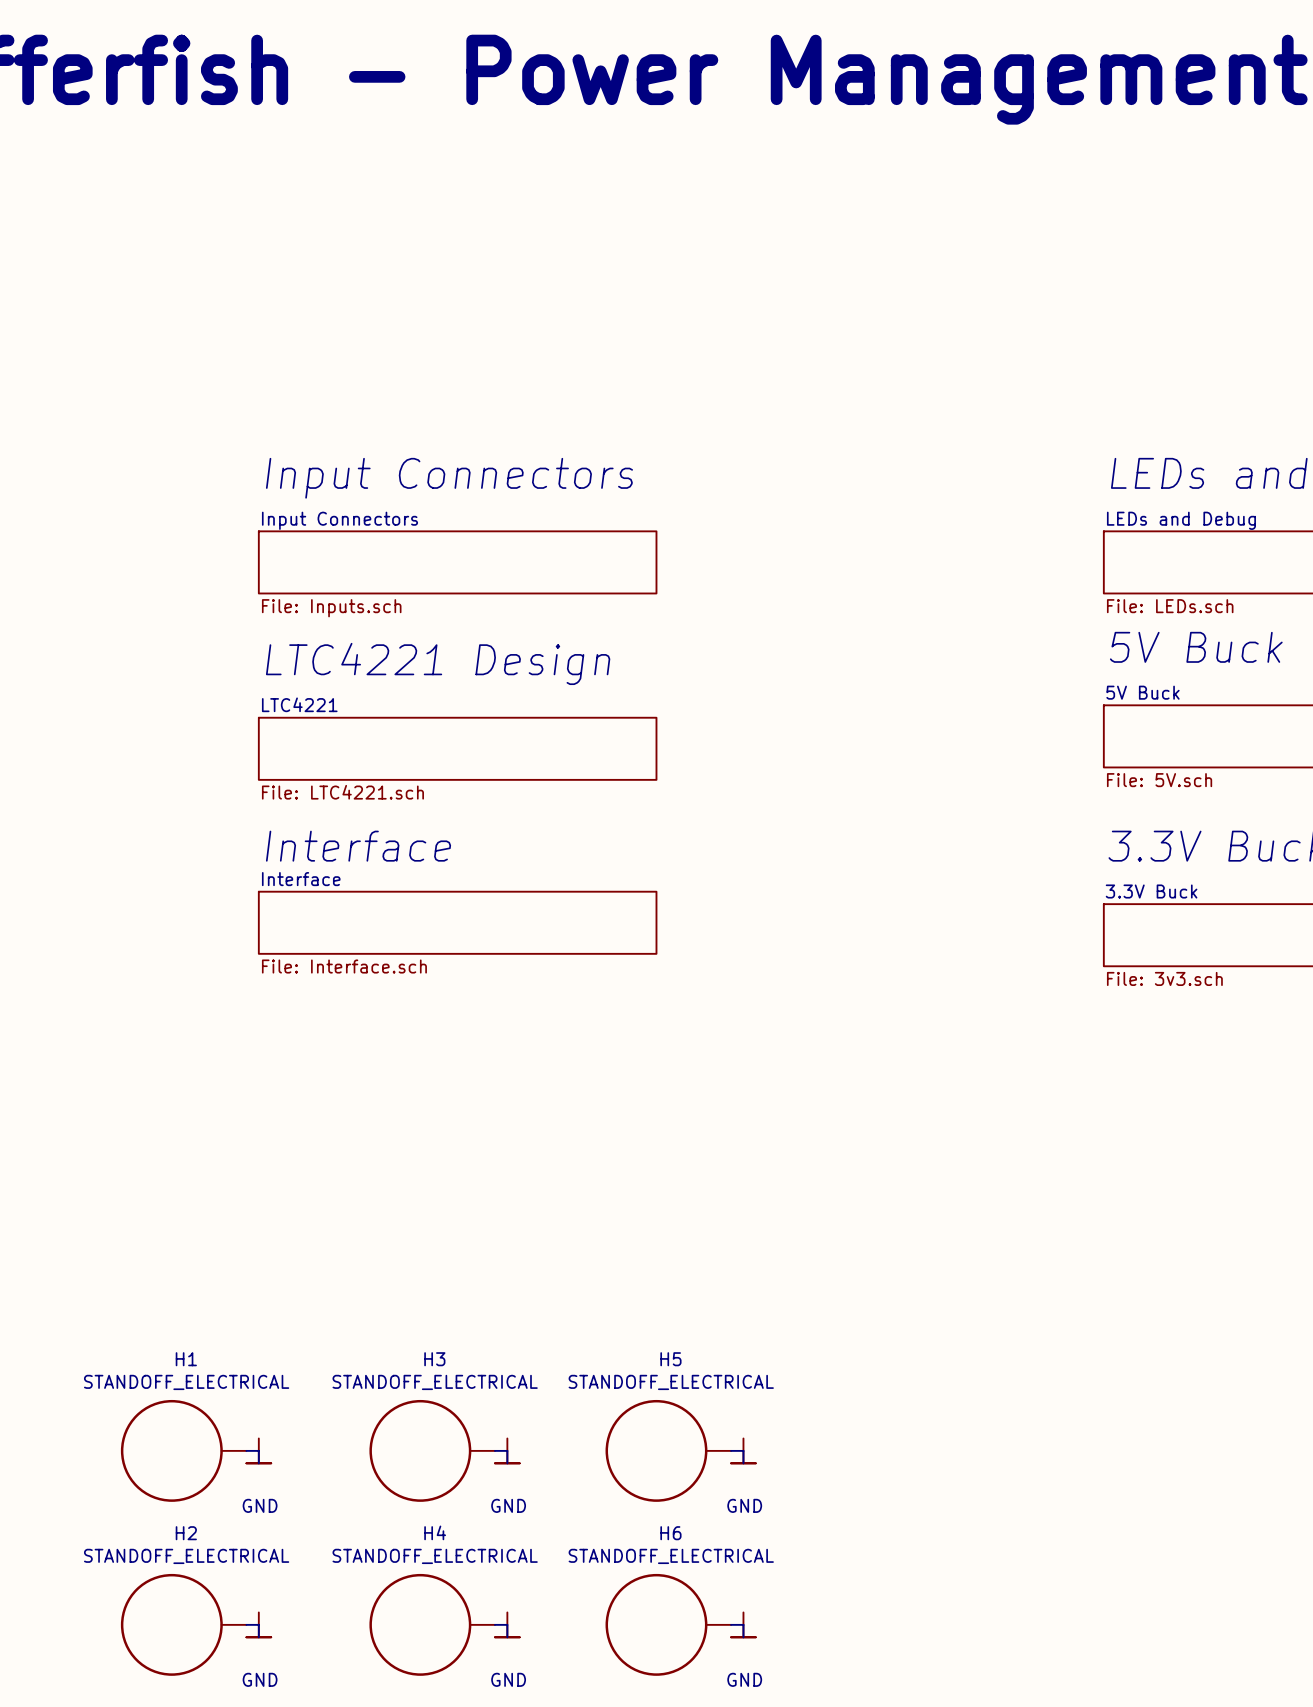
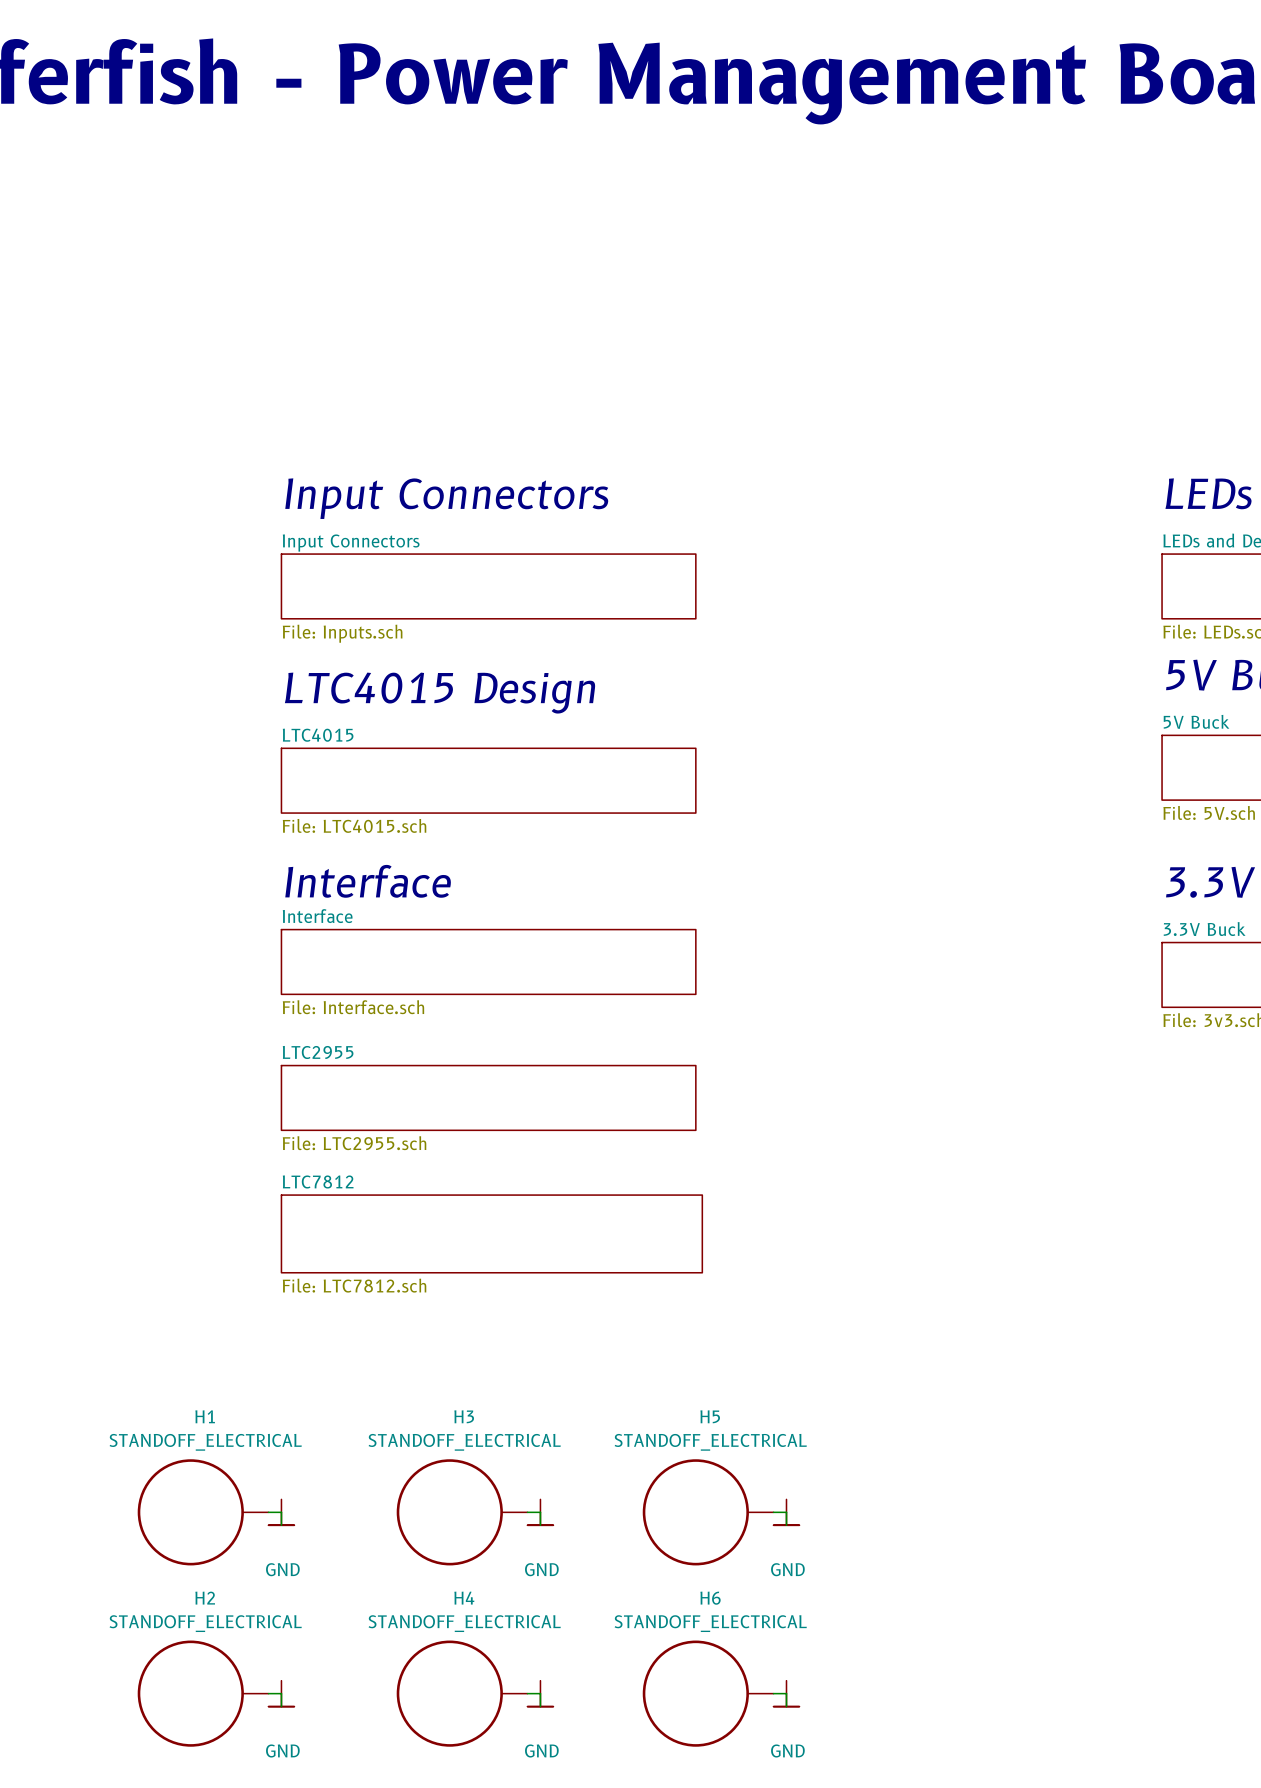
text: LTC4221 Design (438, 663) -> LTC4015 Design (440, 693)
sheet LTC4221 name: LTC4221 (299, 704) -> LTC4015 (318, 735)
sheet LTC4221 value: File: LTC4221.sch (342, 792) -> File: LTC4015.sch (354, 825)
sheet LTC2955: none -> File: LTC2955.sch (488, 1097)
sheet LTC7812: none -> File: LTC7812.sch (491, 1233)

